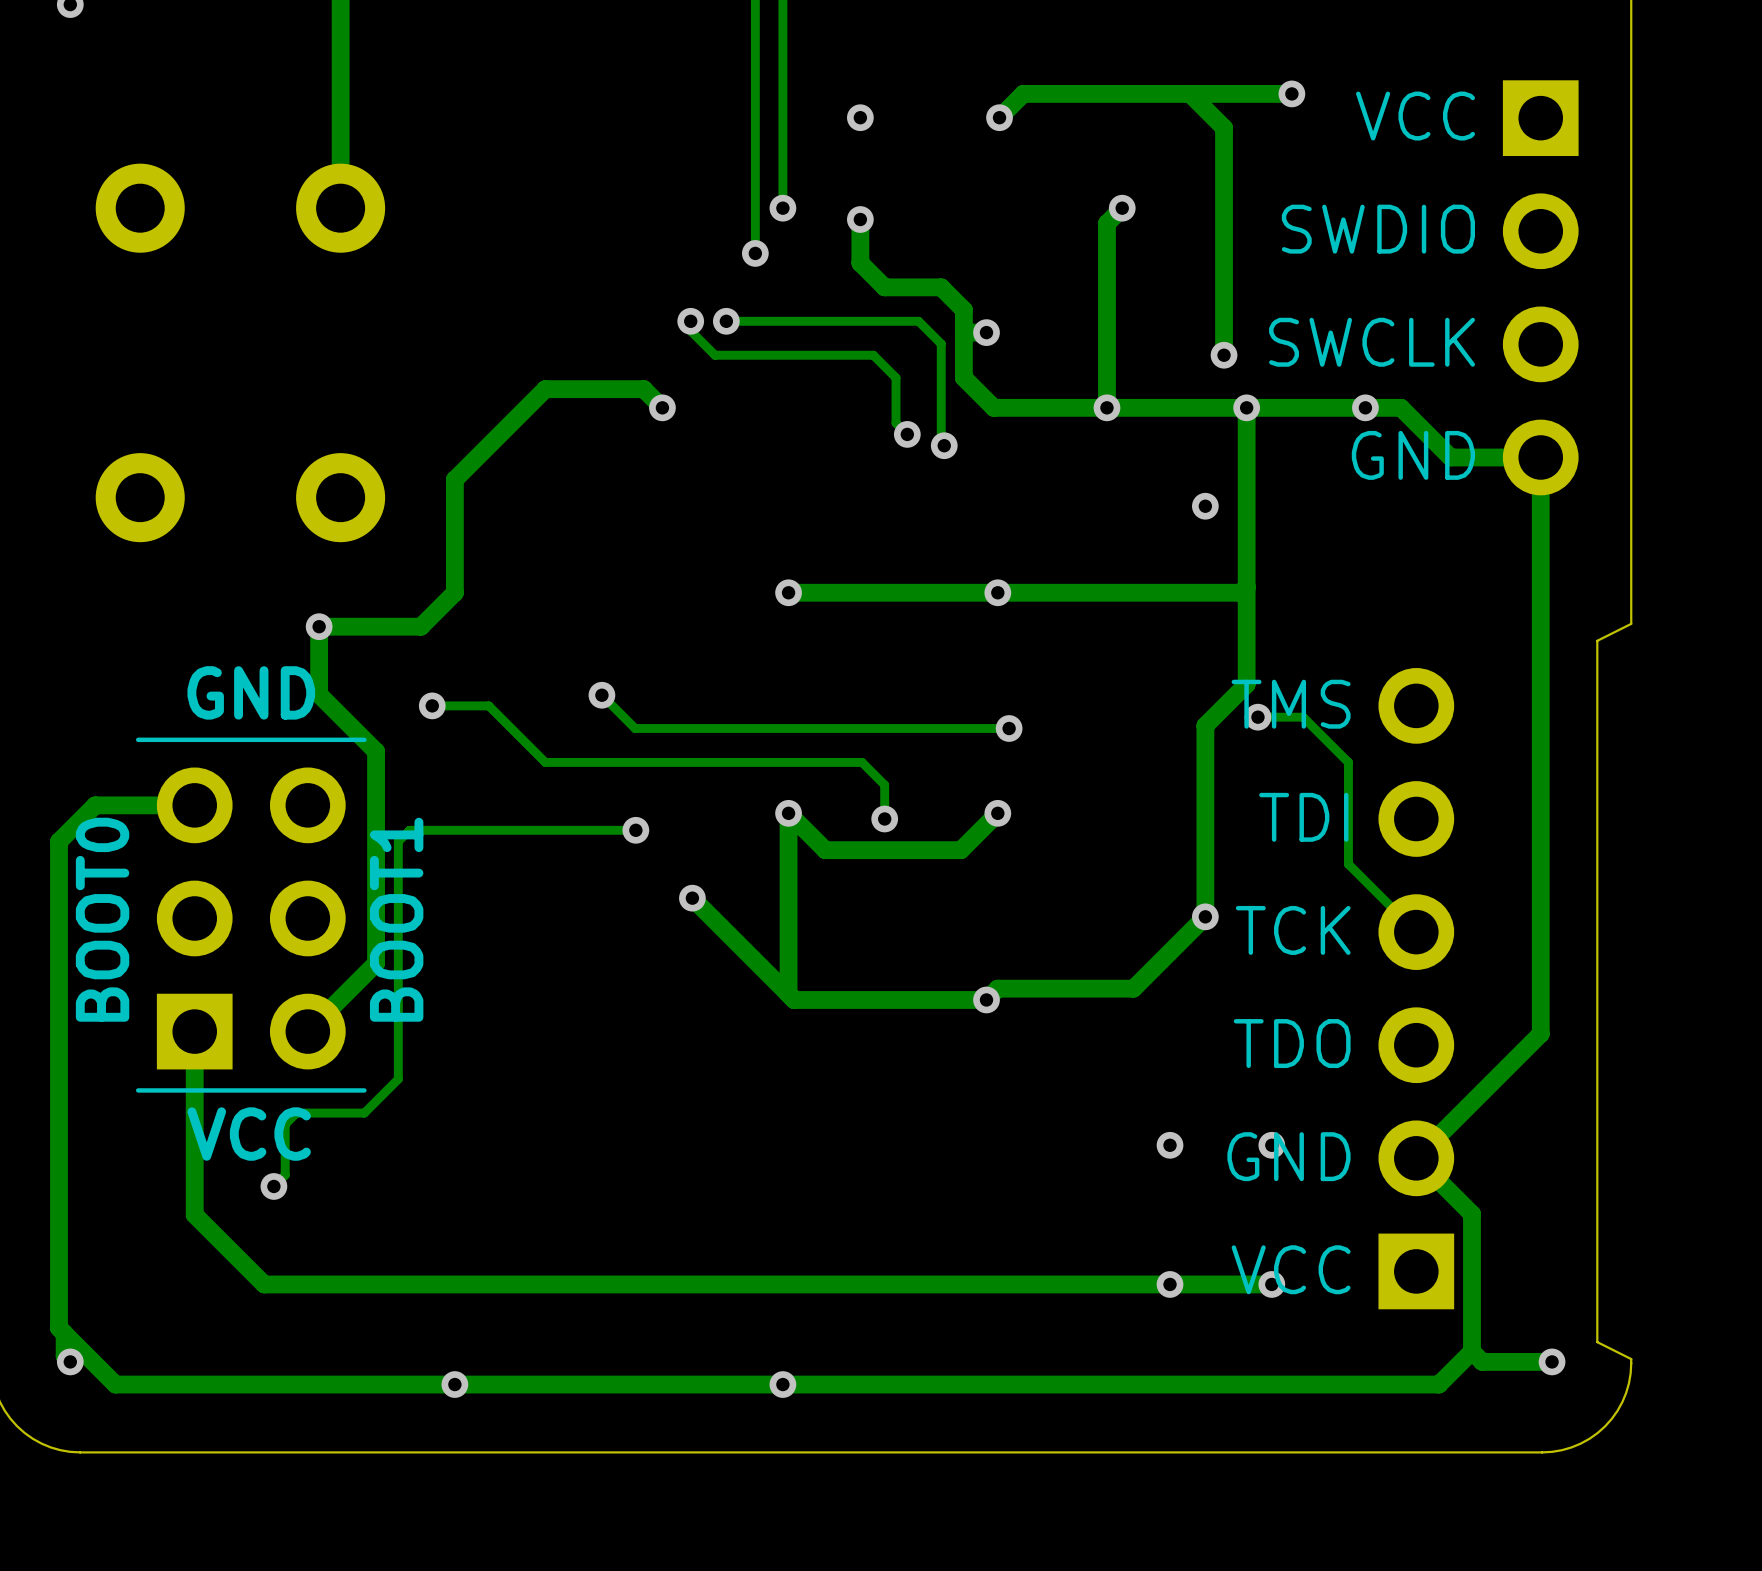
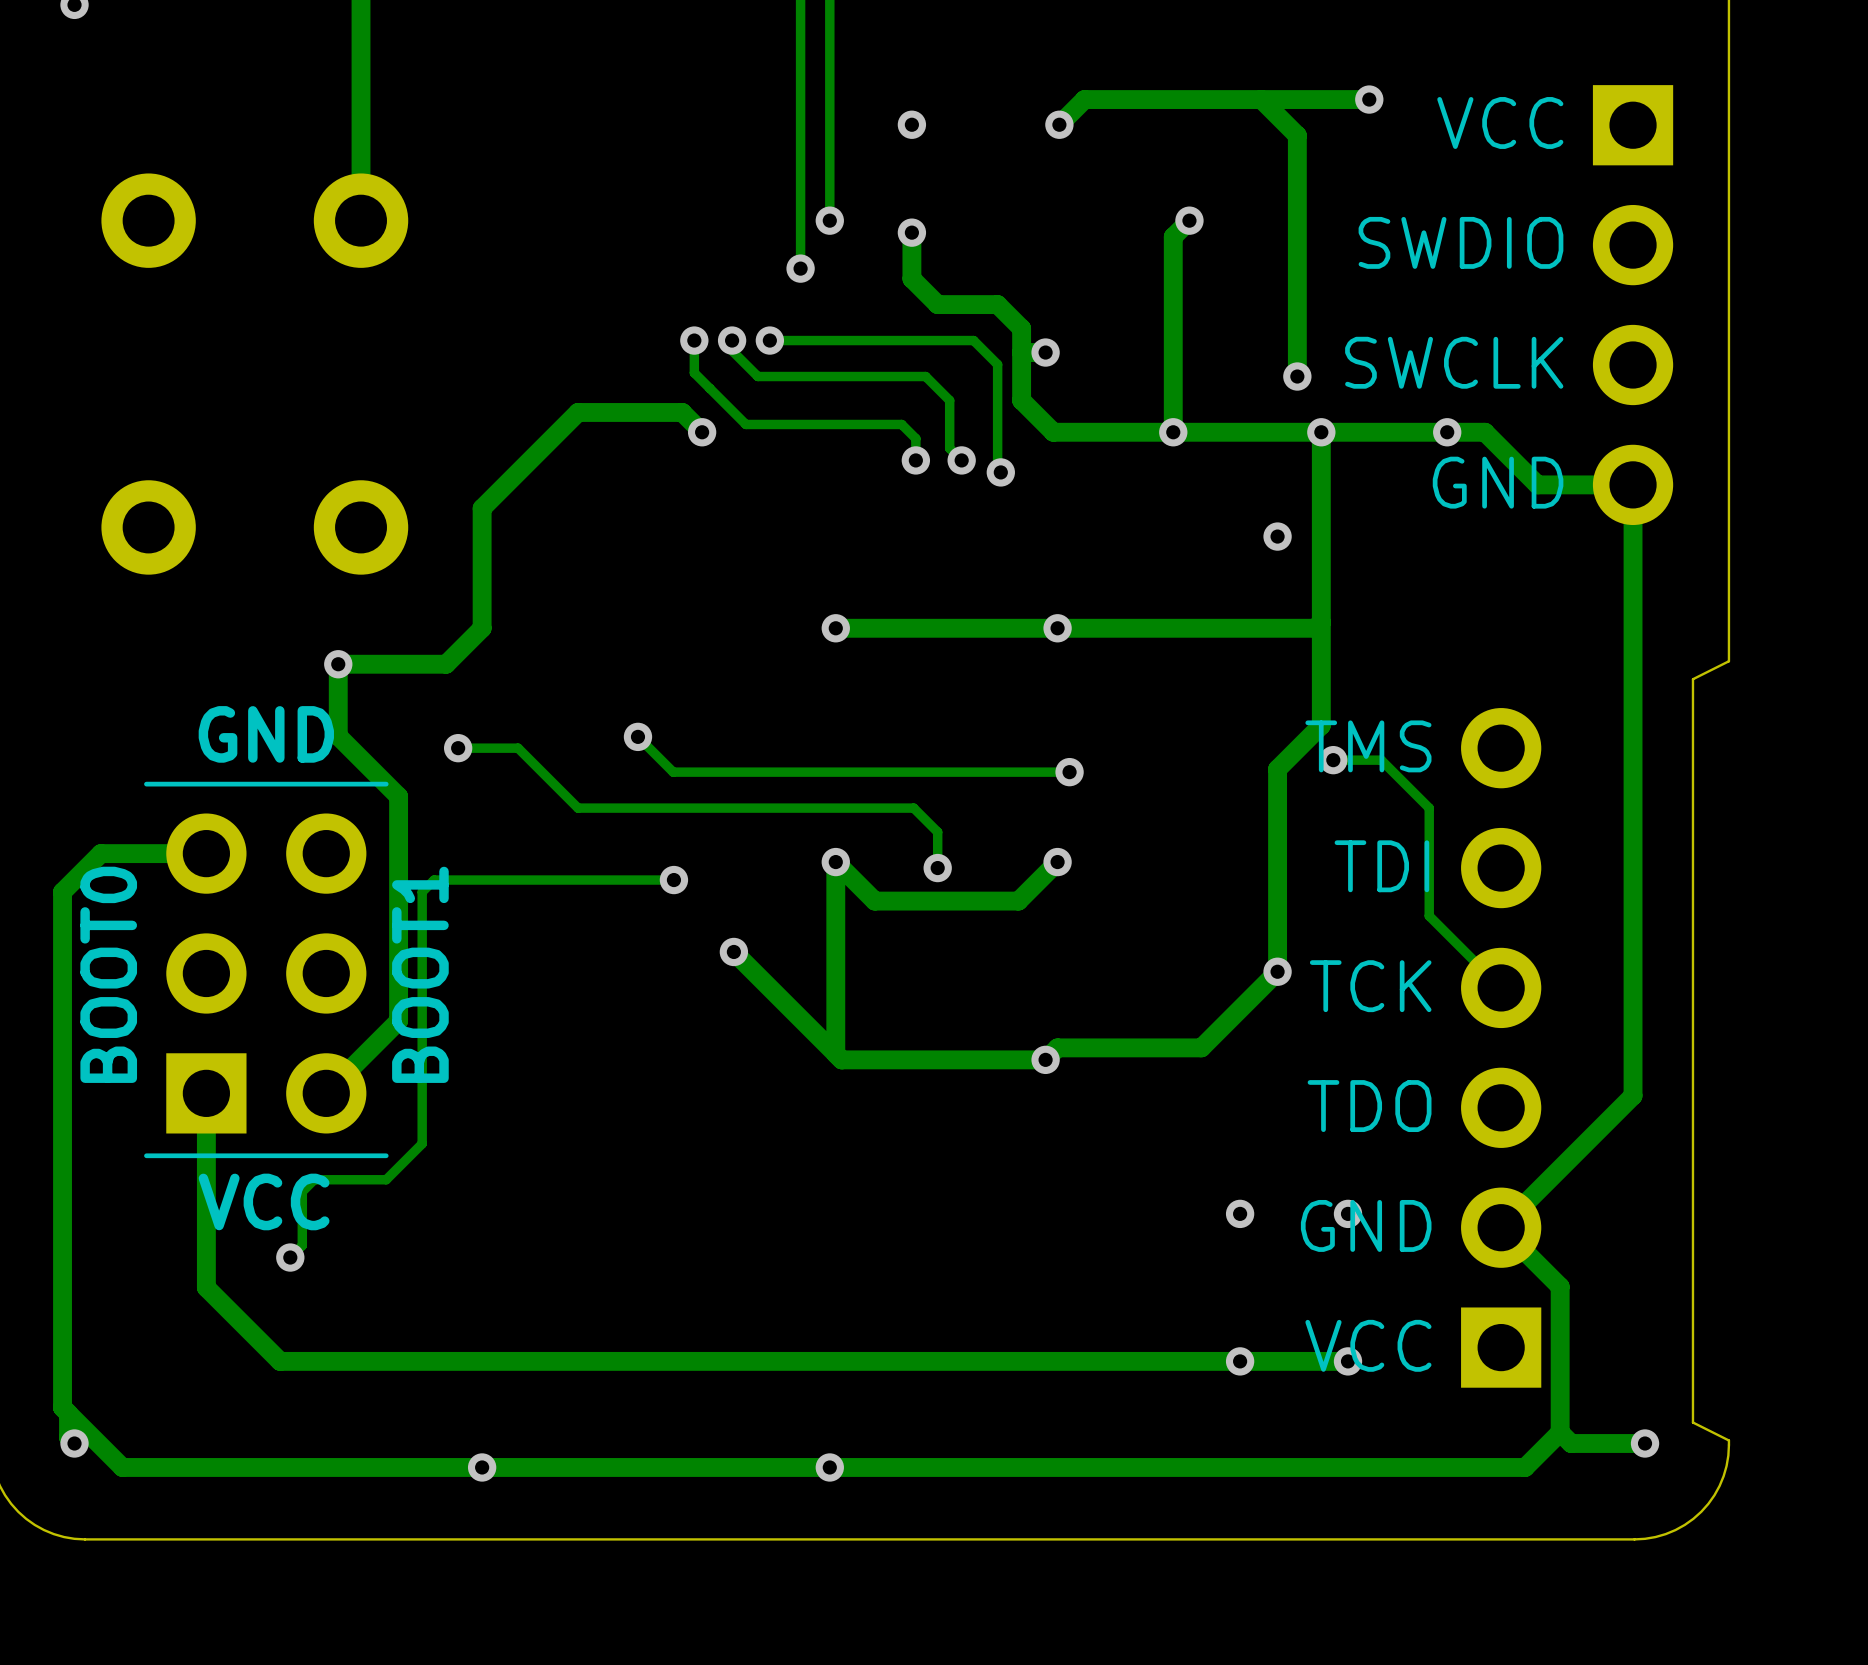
track: none -> (694, 340) (694, 372) (745, 424) (901, 424) (915, 438) (915, 460)
via: none -> (694, 340)
via: none -> (915, 460)

